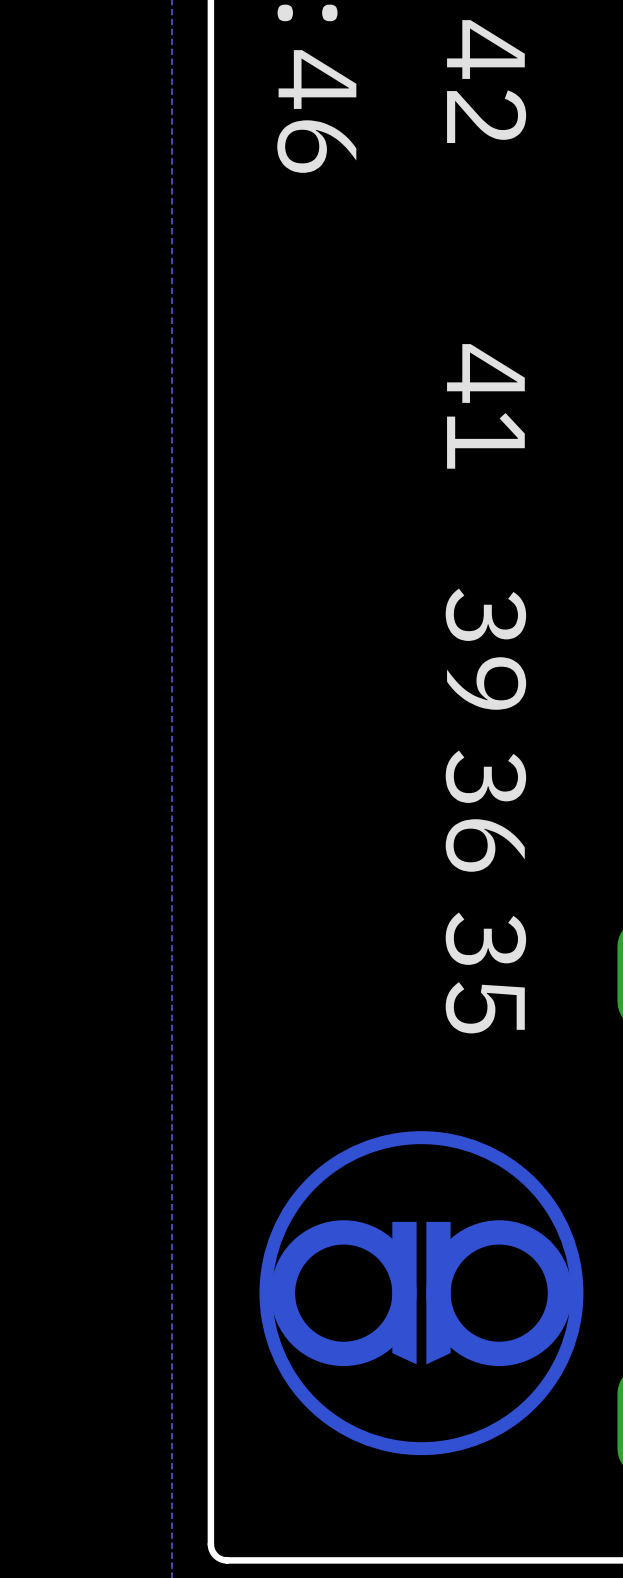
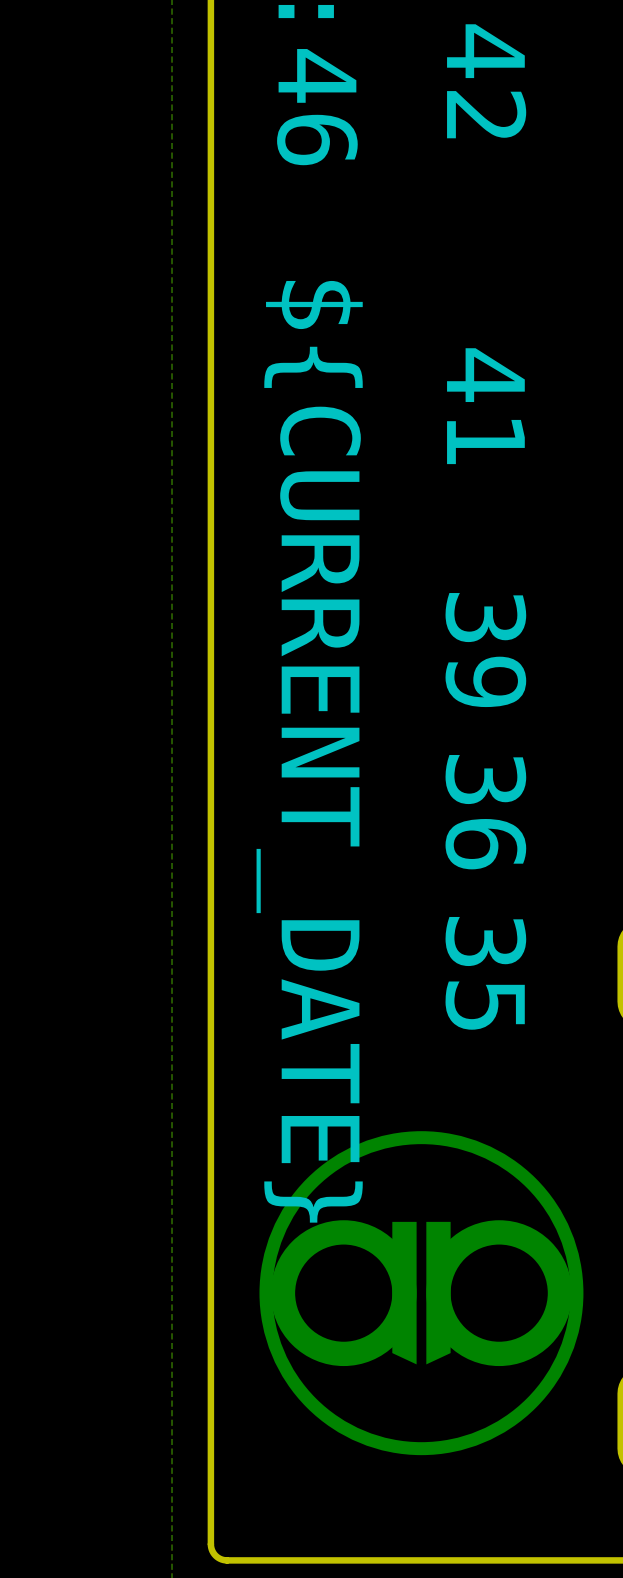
text: none -> ${CURRENT_DATE} (309, 751)

